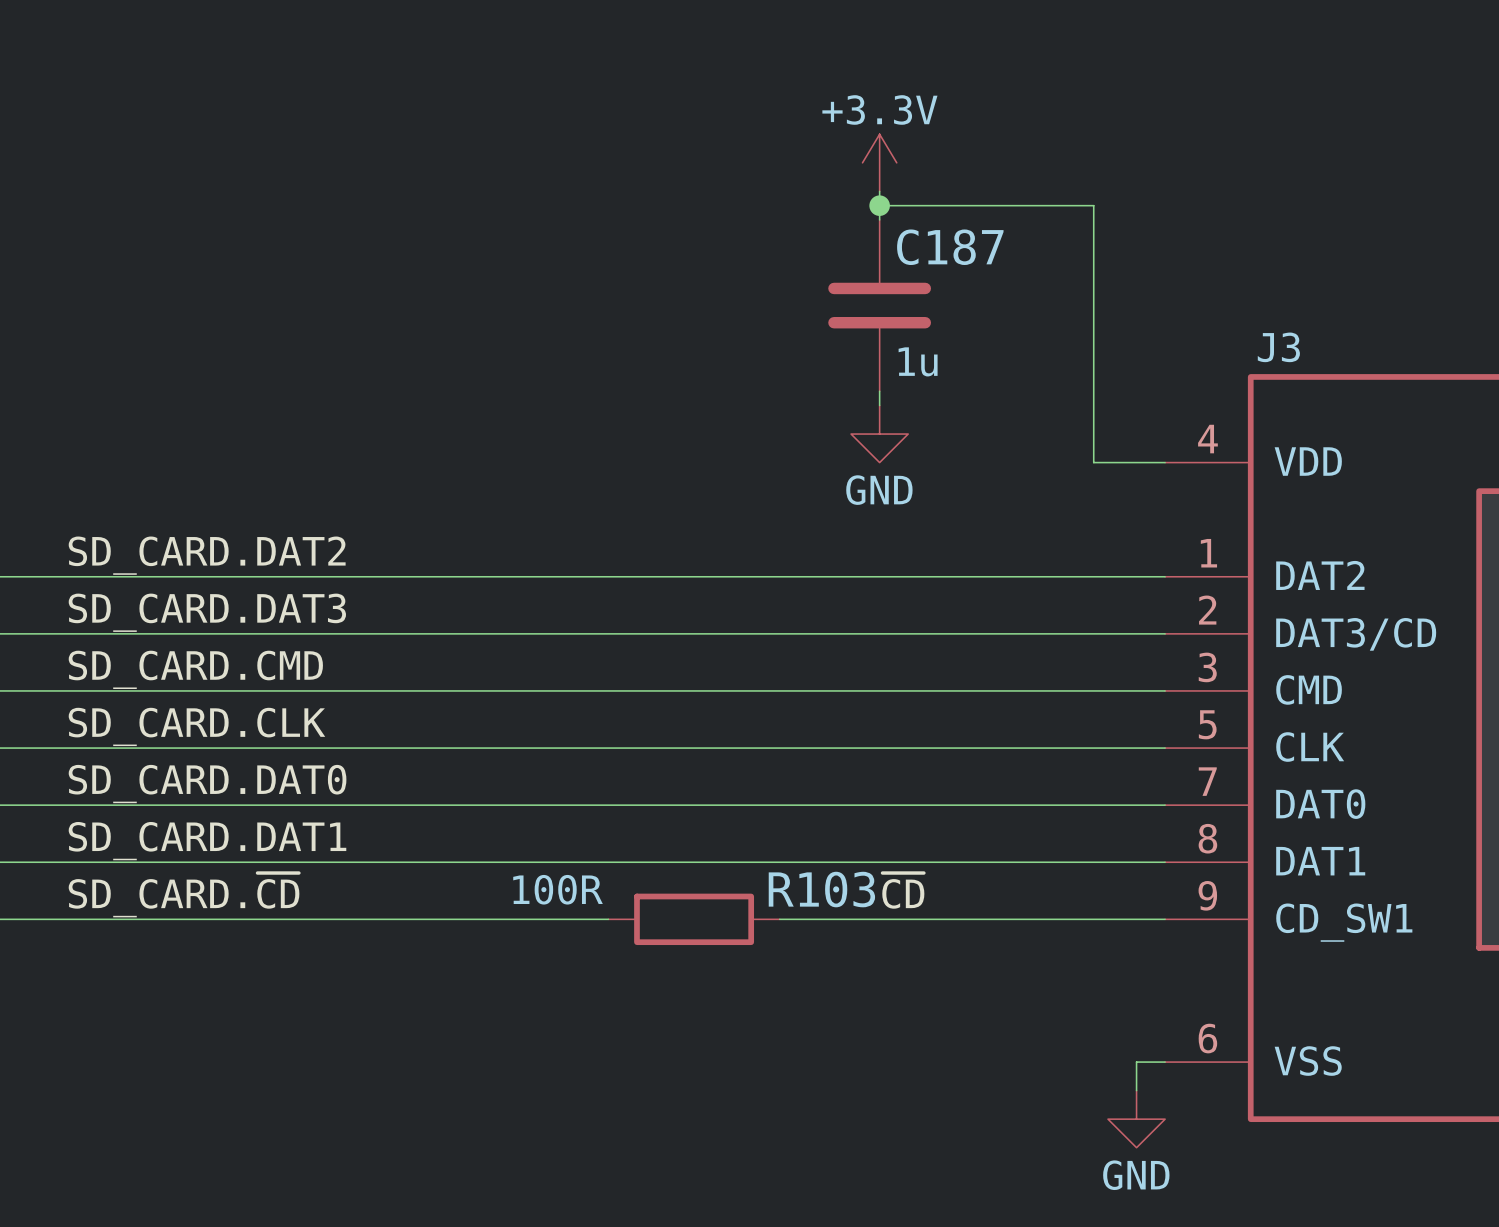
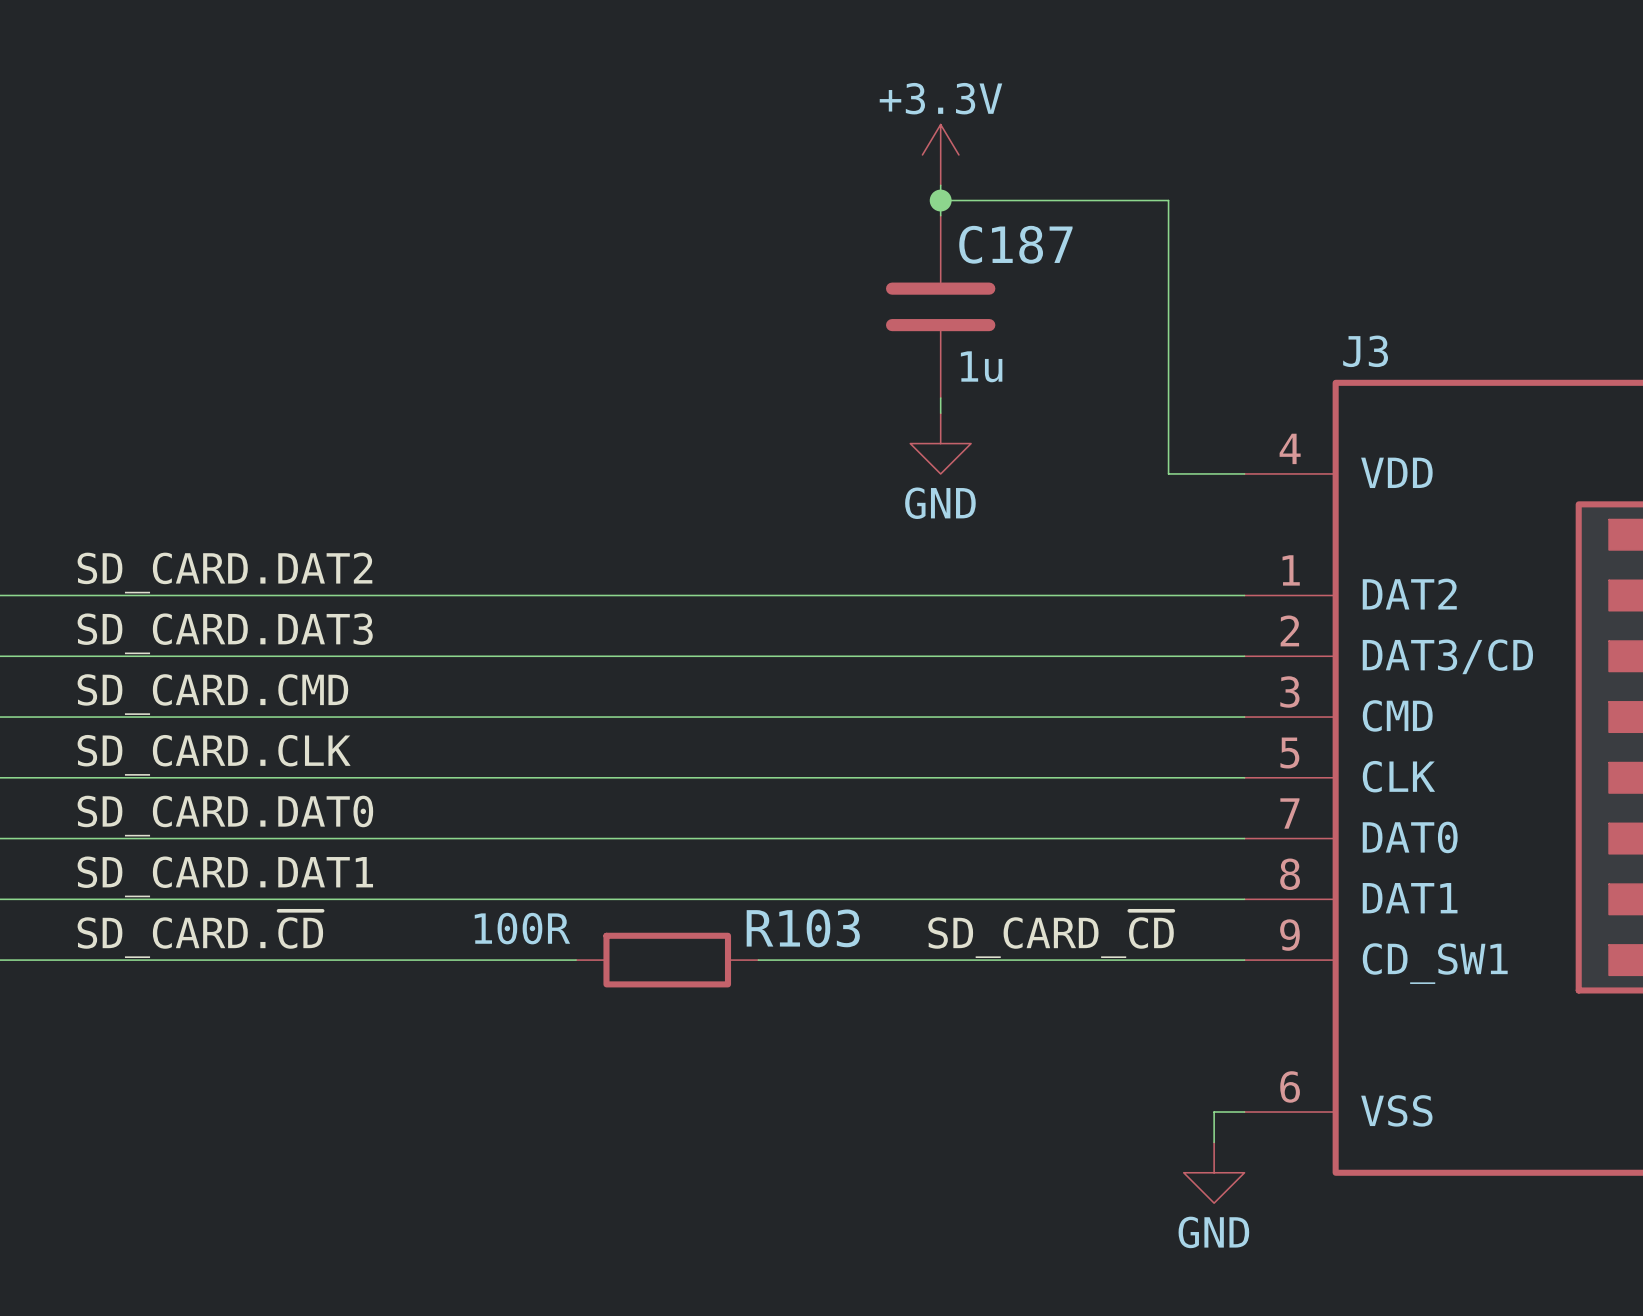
label: ~{CD} (903, 890) -> SD_CARD_~{CD} (1051, 934)
wire: (537, 919) (608, 919) -> (758, 960) (834, 960)
R103 position: (694, 919) -> (667, 960)

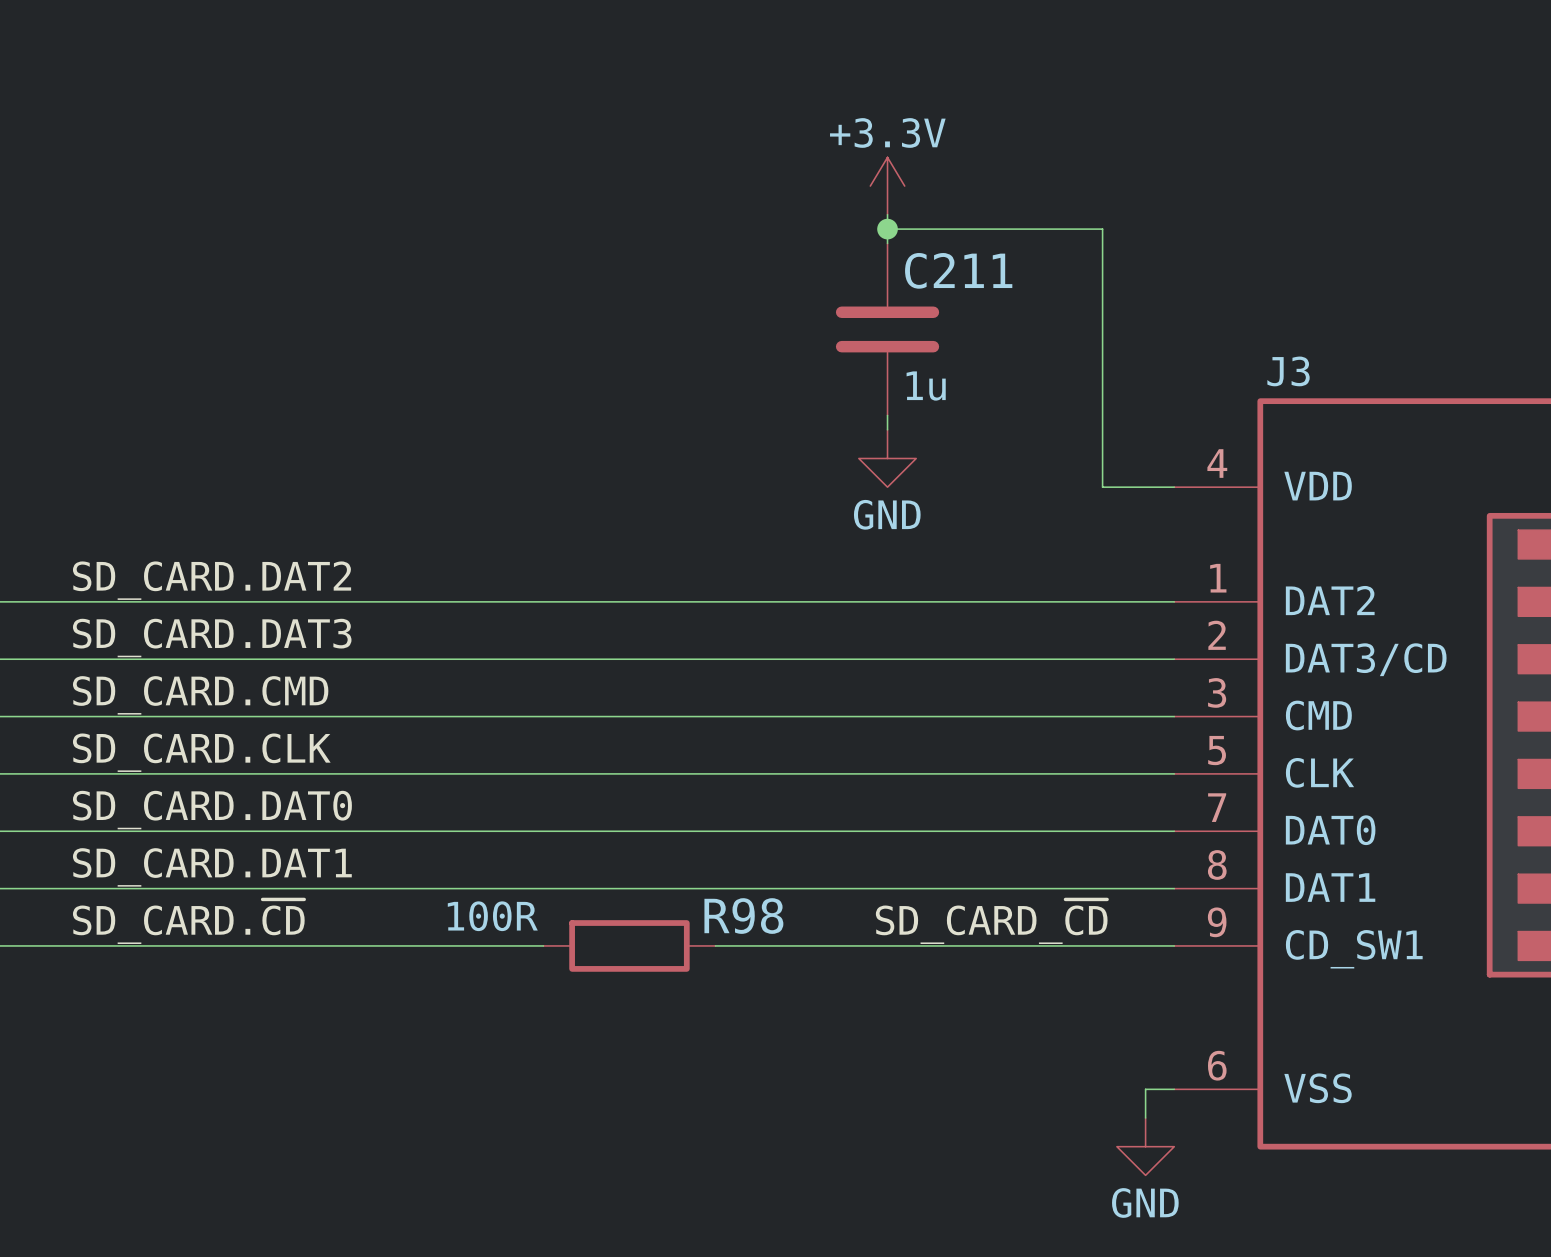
C187 name: C187 (1015, 244) -> C211 (958, 270)
R103 name: R103 (803, 928) -> R98 (743, 916)

